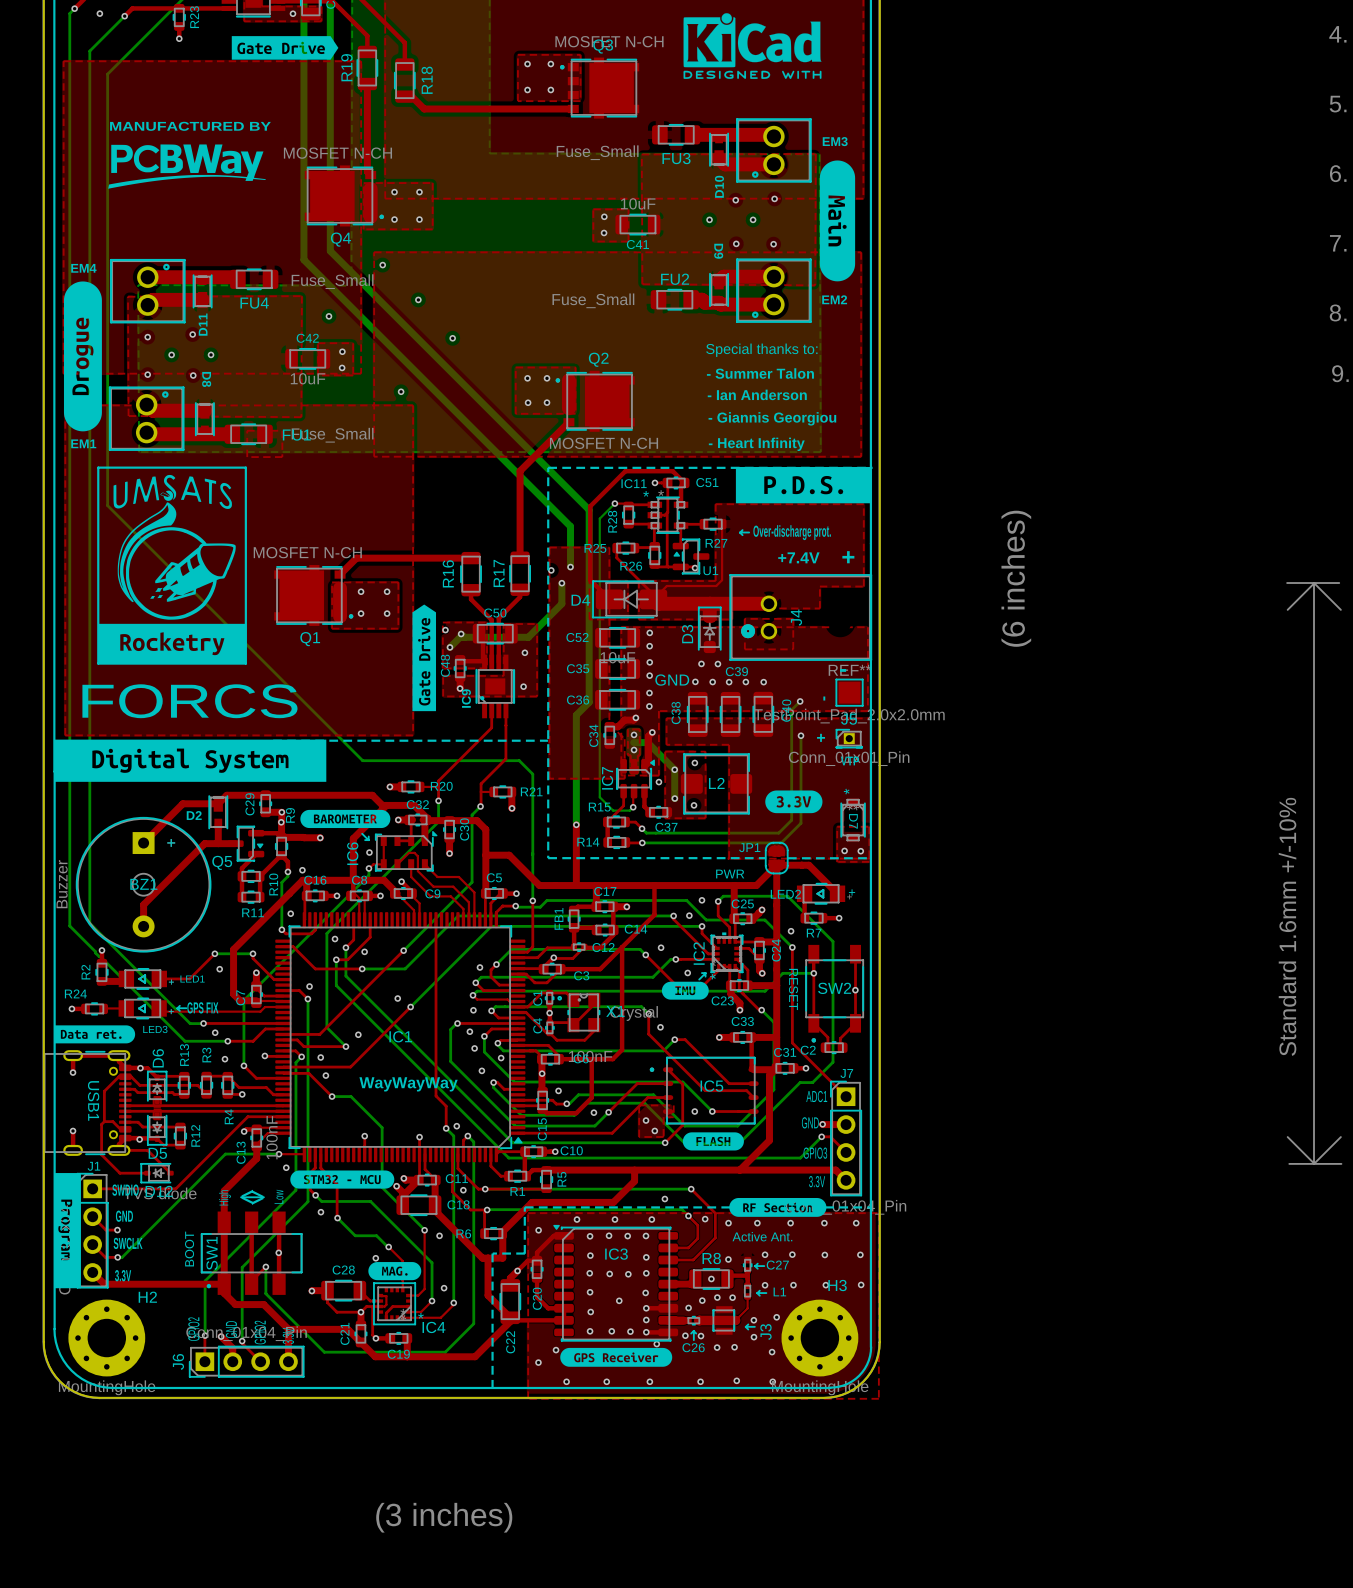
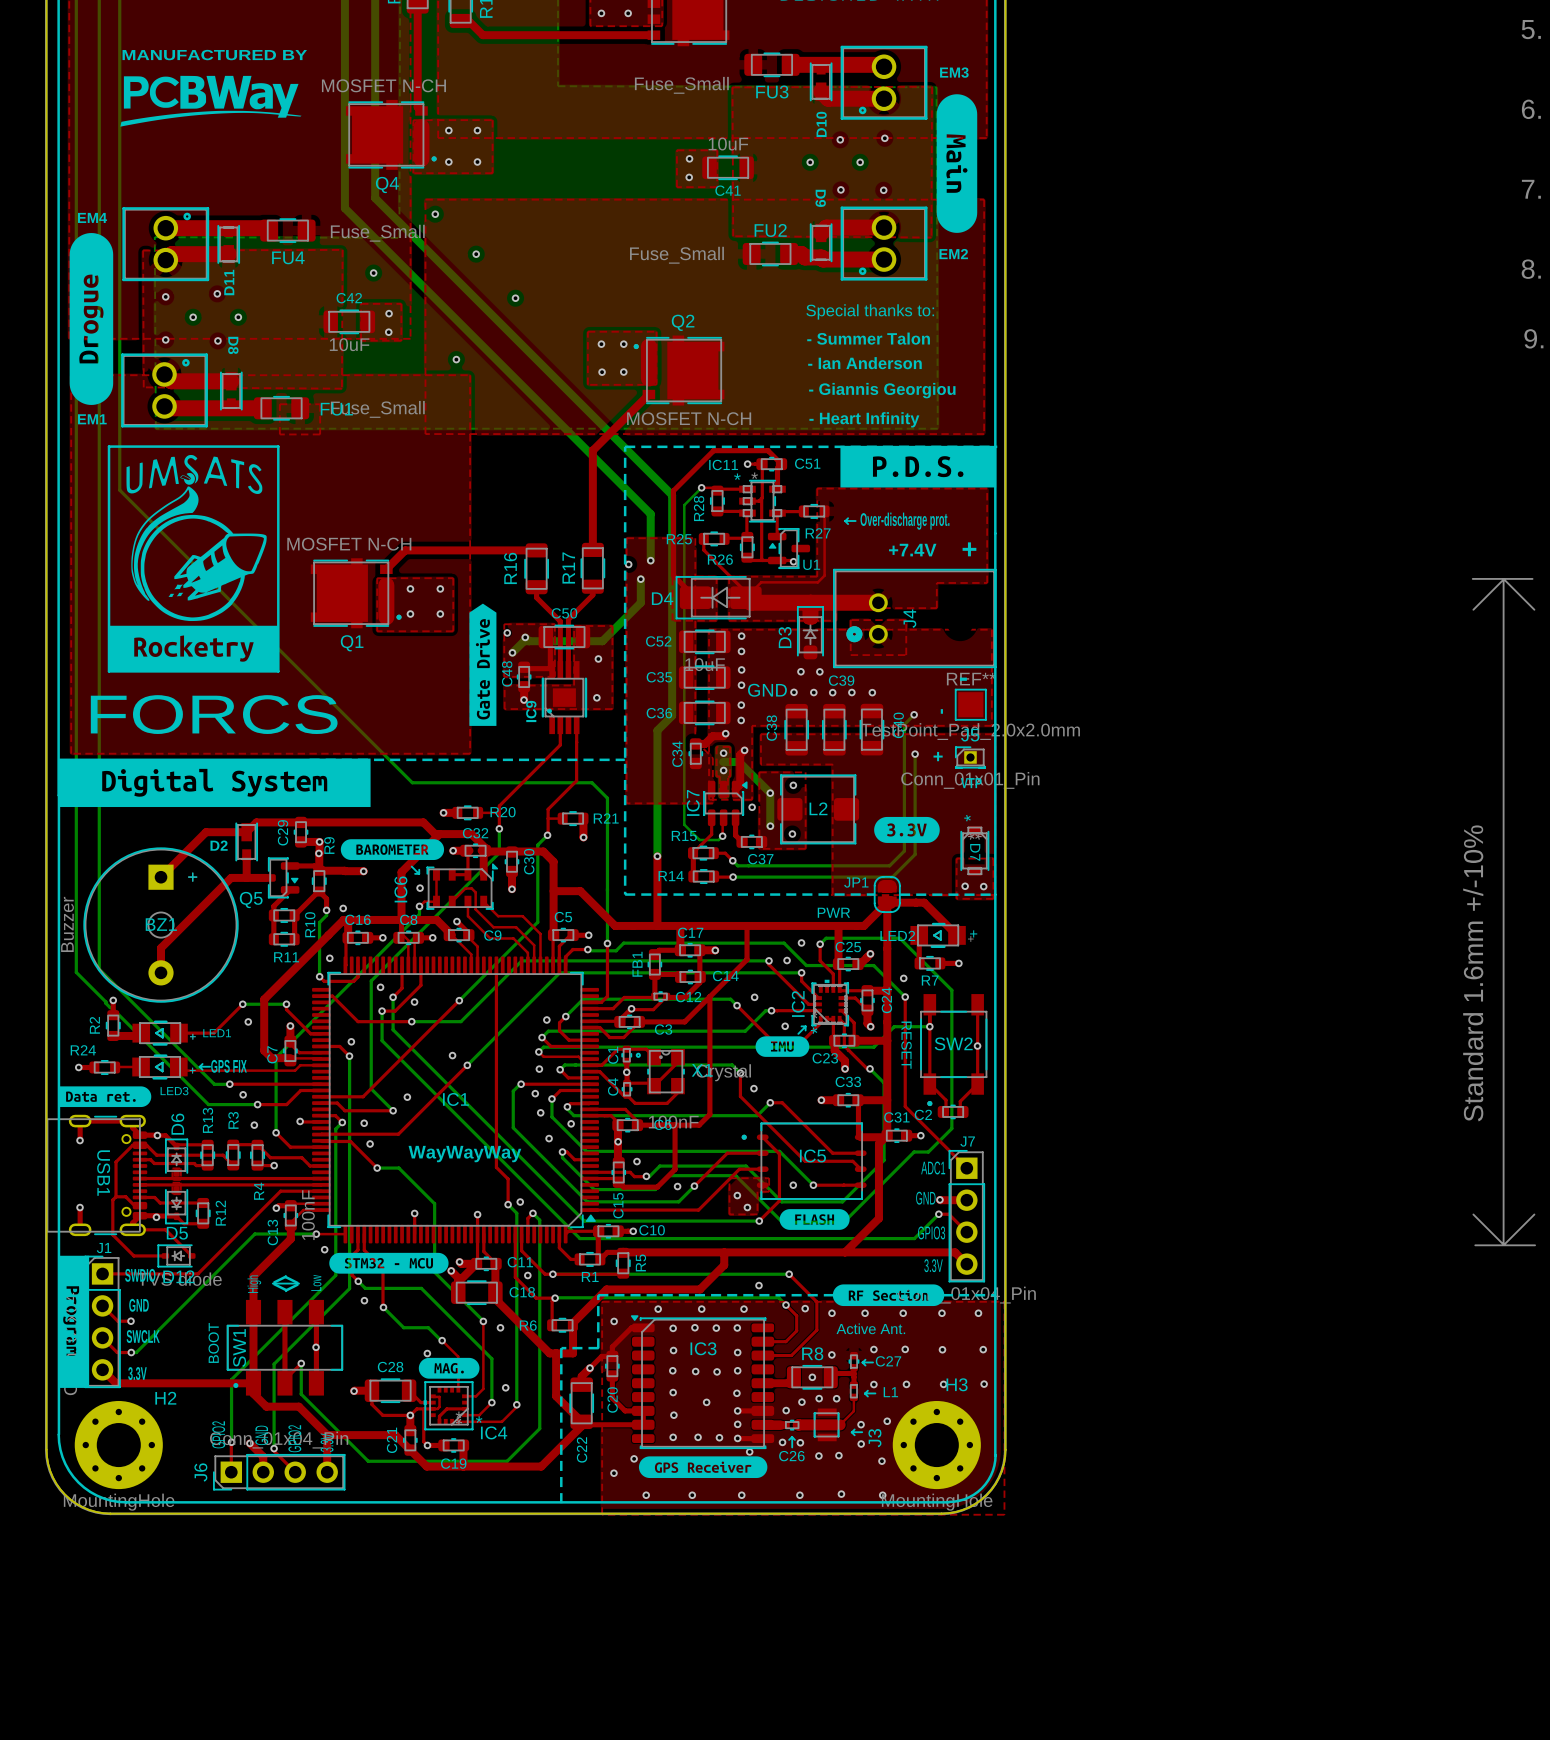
text: (6 inches) (1016, 578) -> none
text: (3 inches) (444, 1517) -> none

